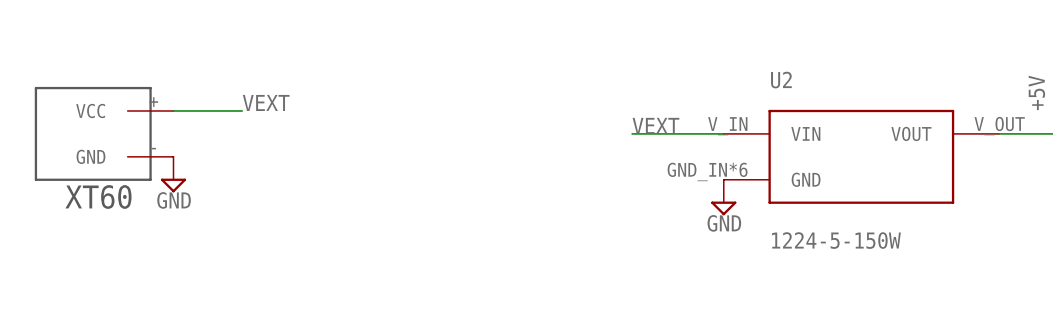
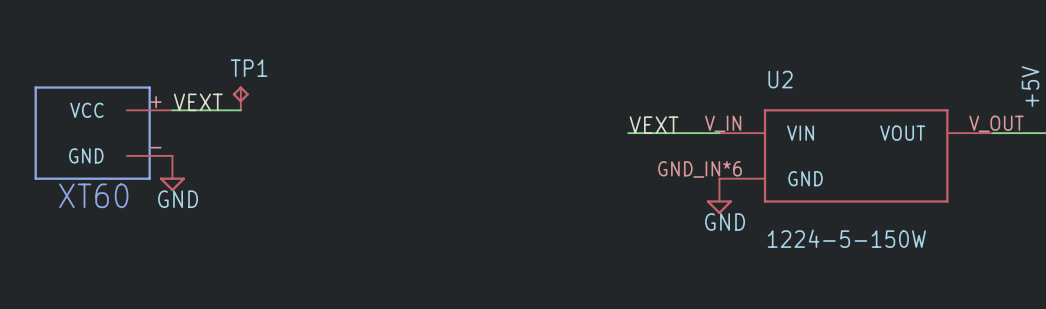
TP1: none -> (240, 98)
label position: VEXT (266, 102) -> VEXT (198, 102)

